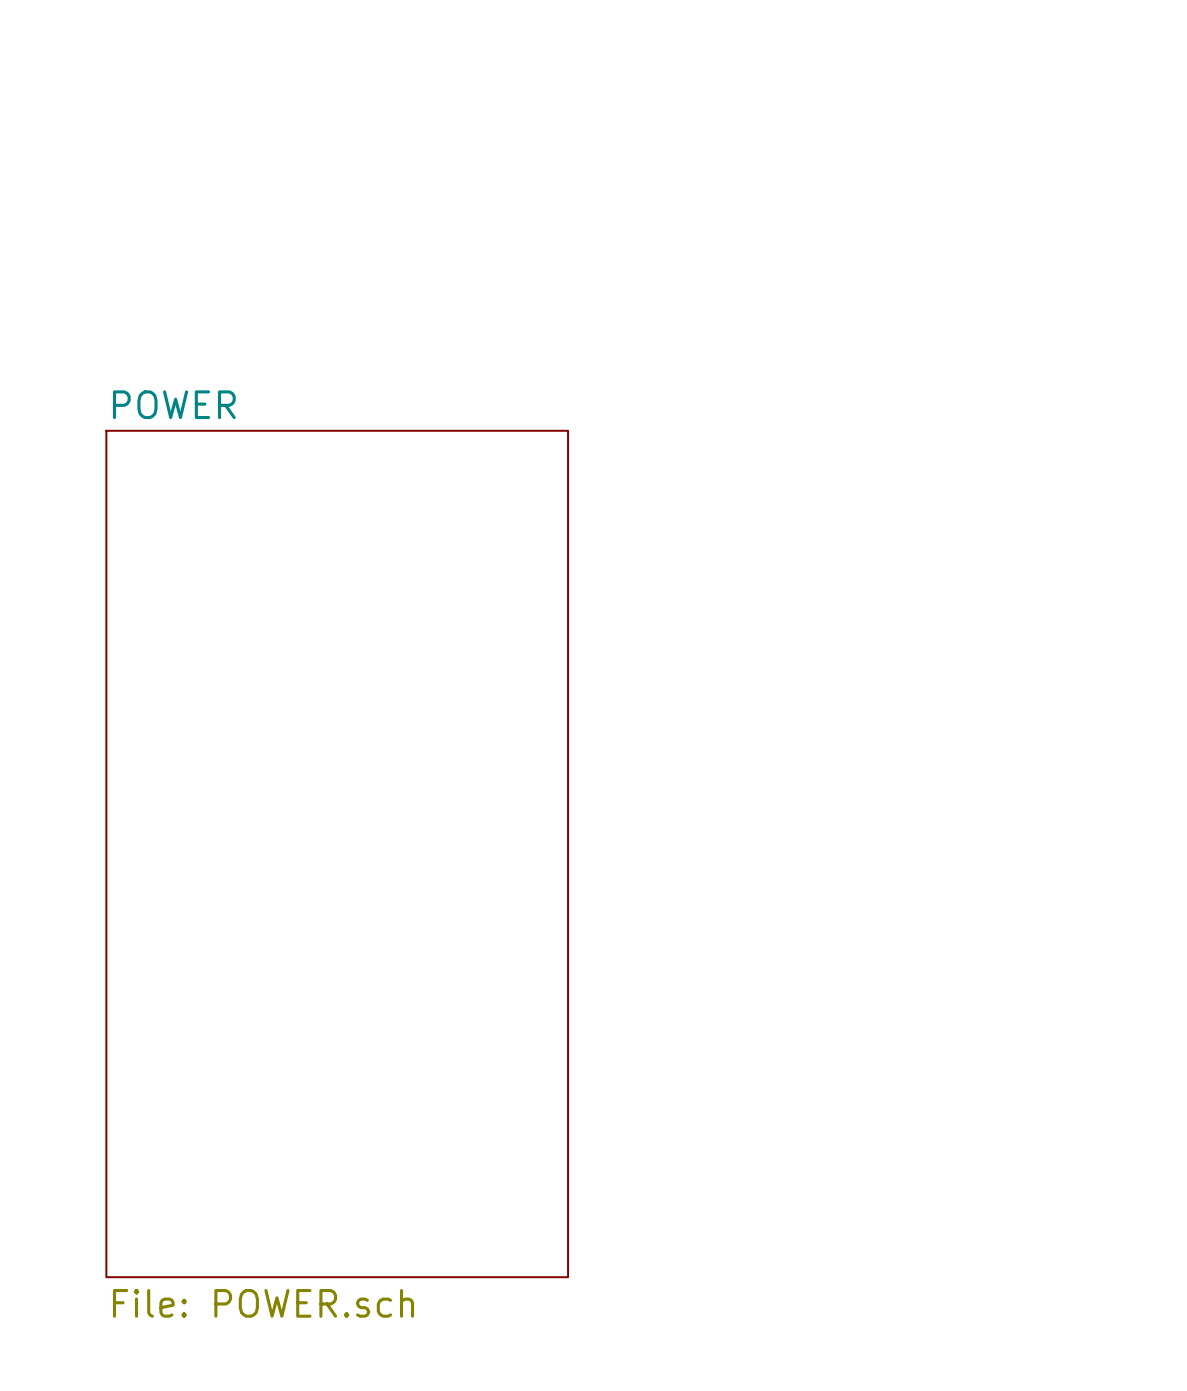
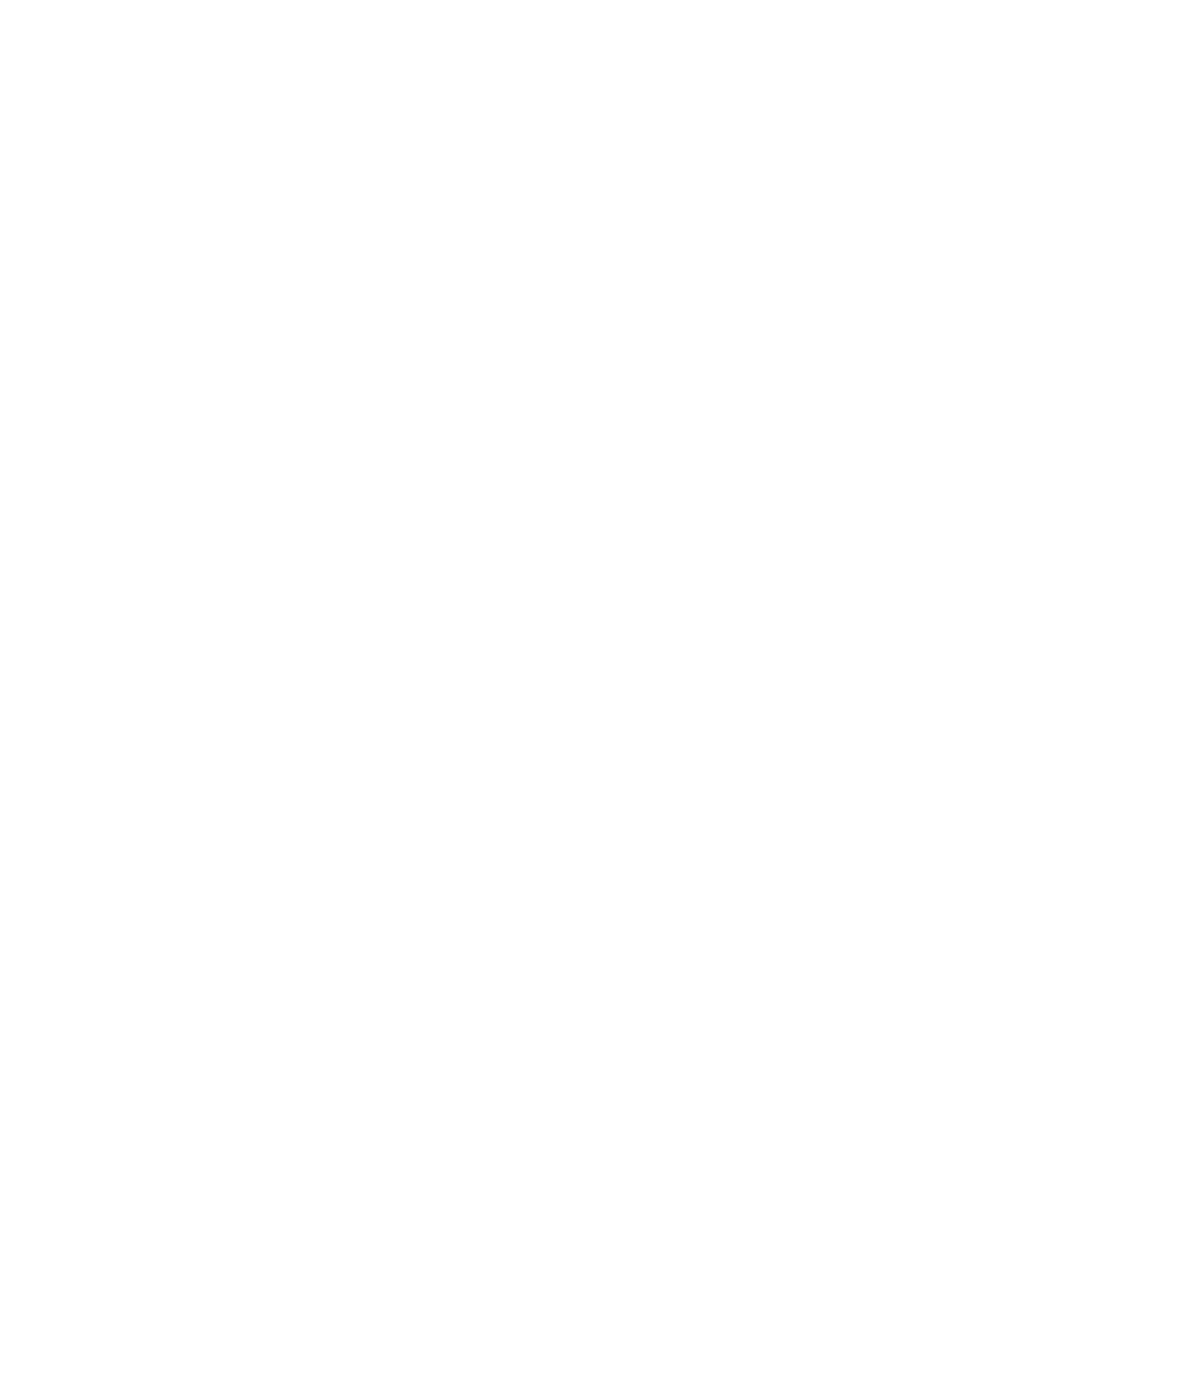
sheet POWER: File: POWER.sch (337, 853) -> none

